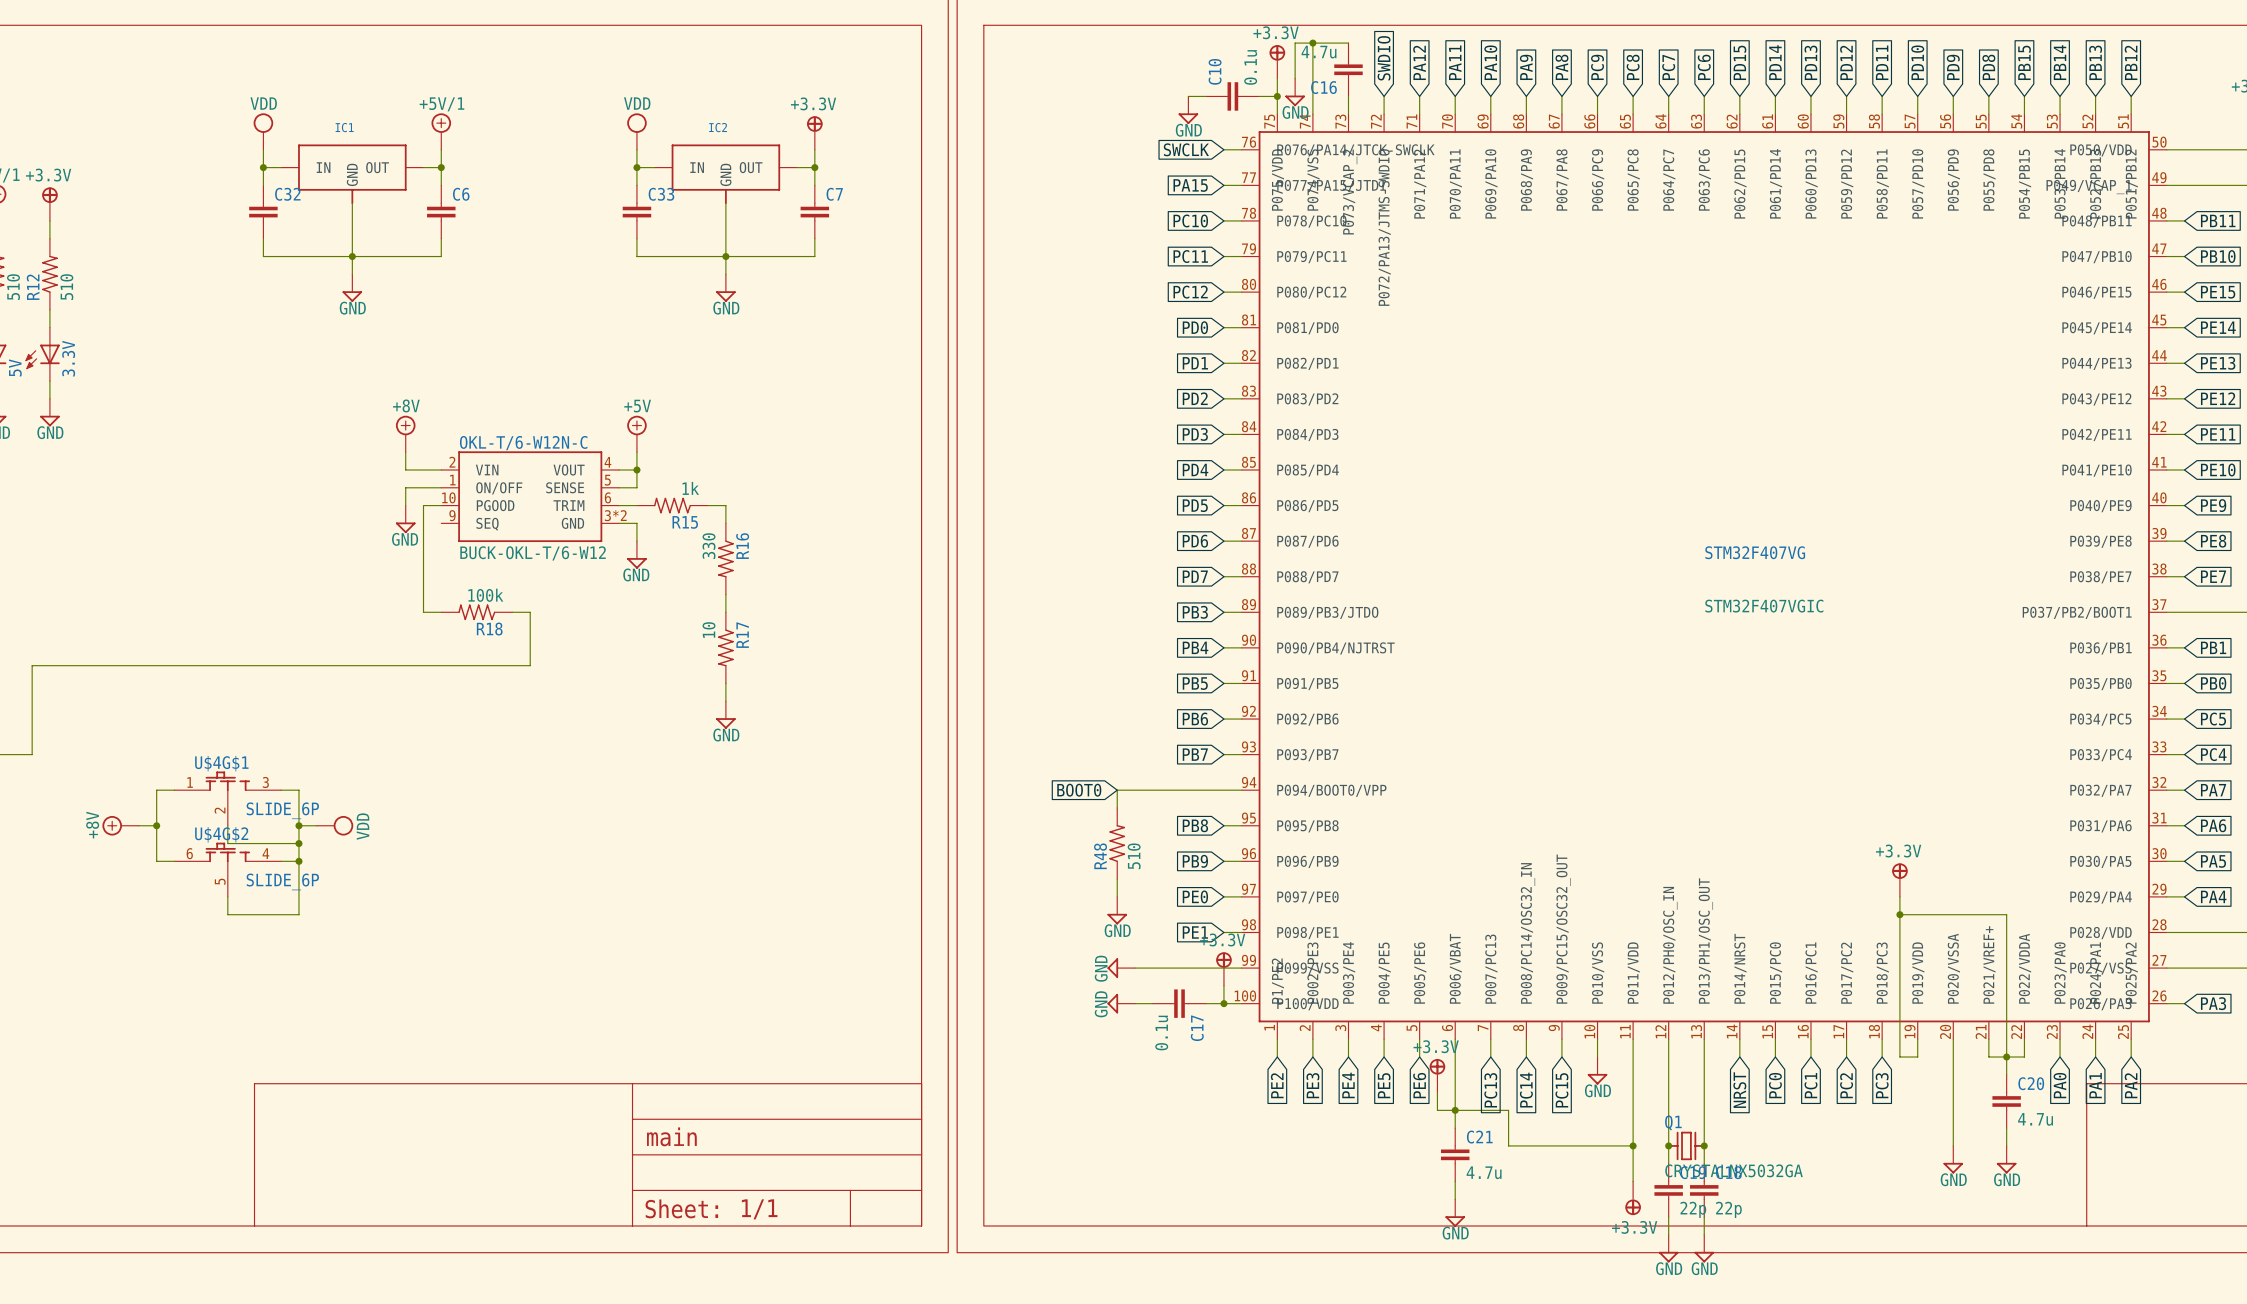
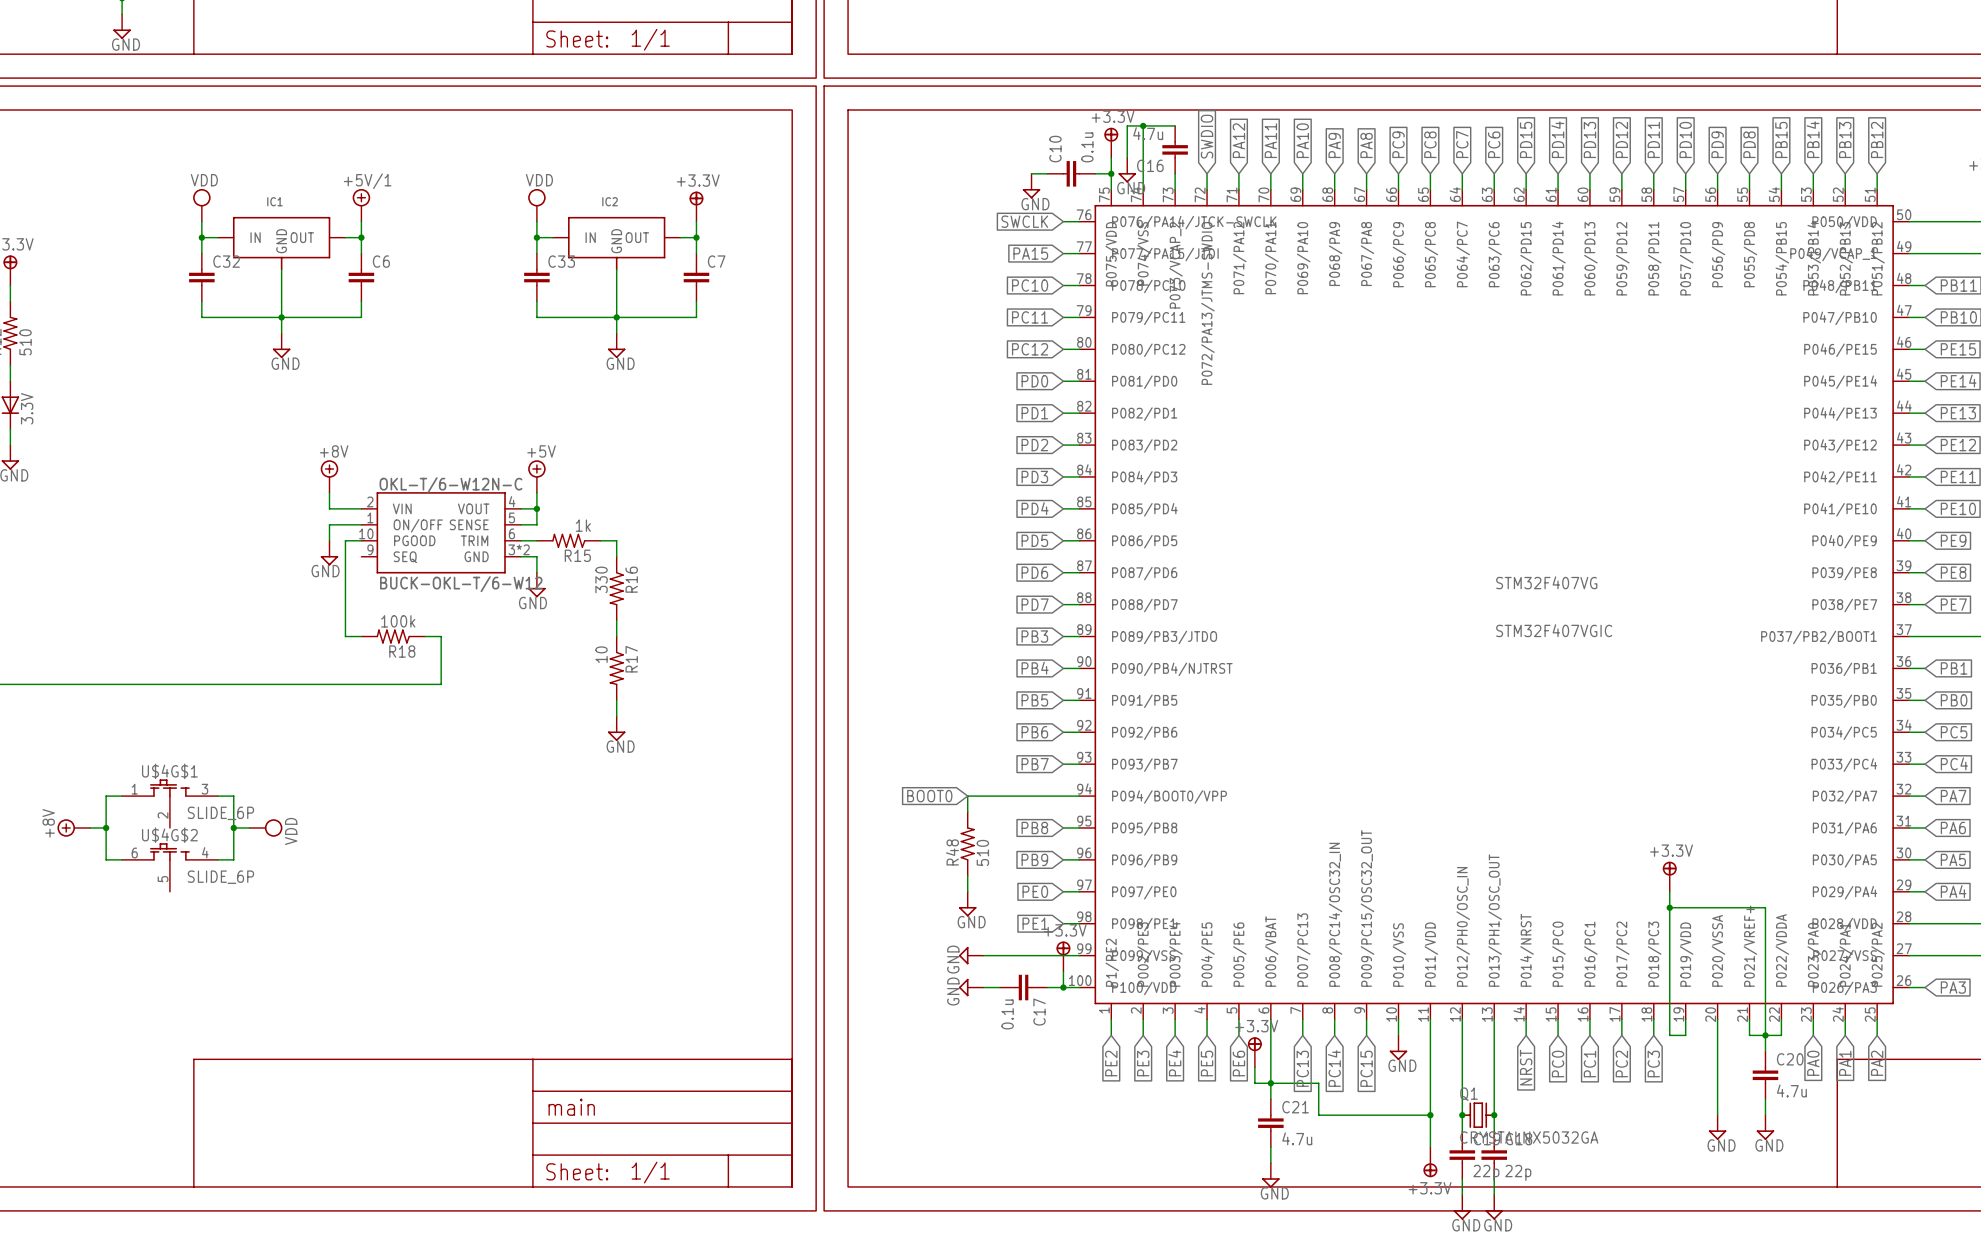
wire: (227, 825) (227, 843) (298, 843) -> none
junction: (298, 843) -> none
wire: (298, 861) (298, 914) (227, 914) (227, 896) -> none
junction: (298, 861) -> none

